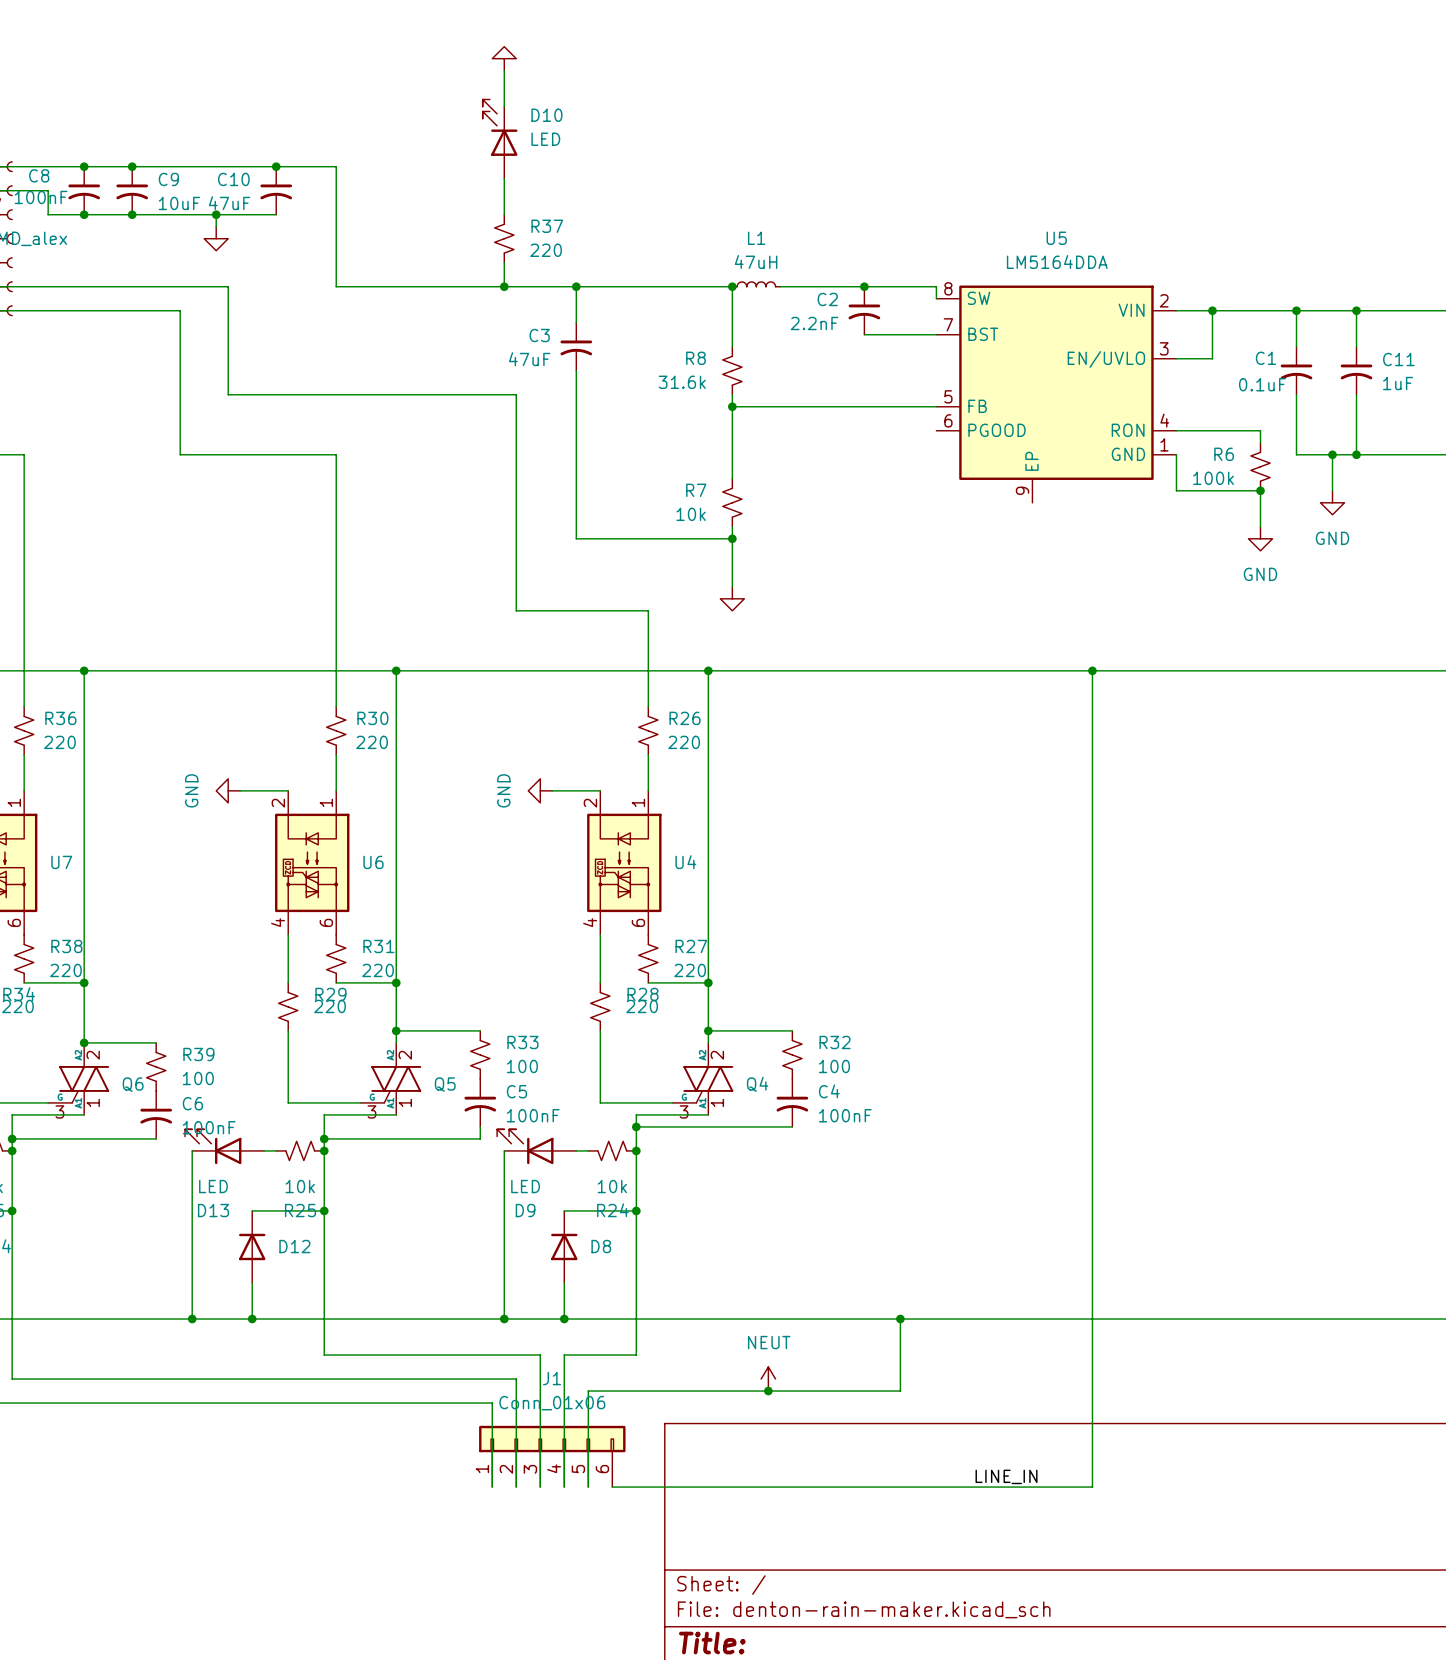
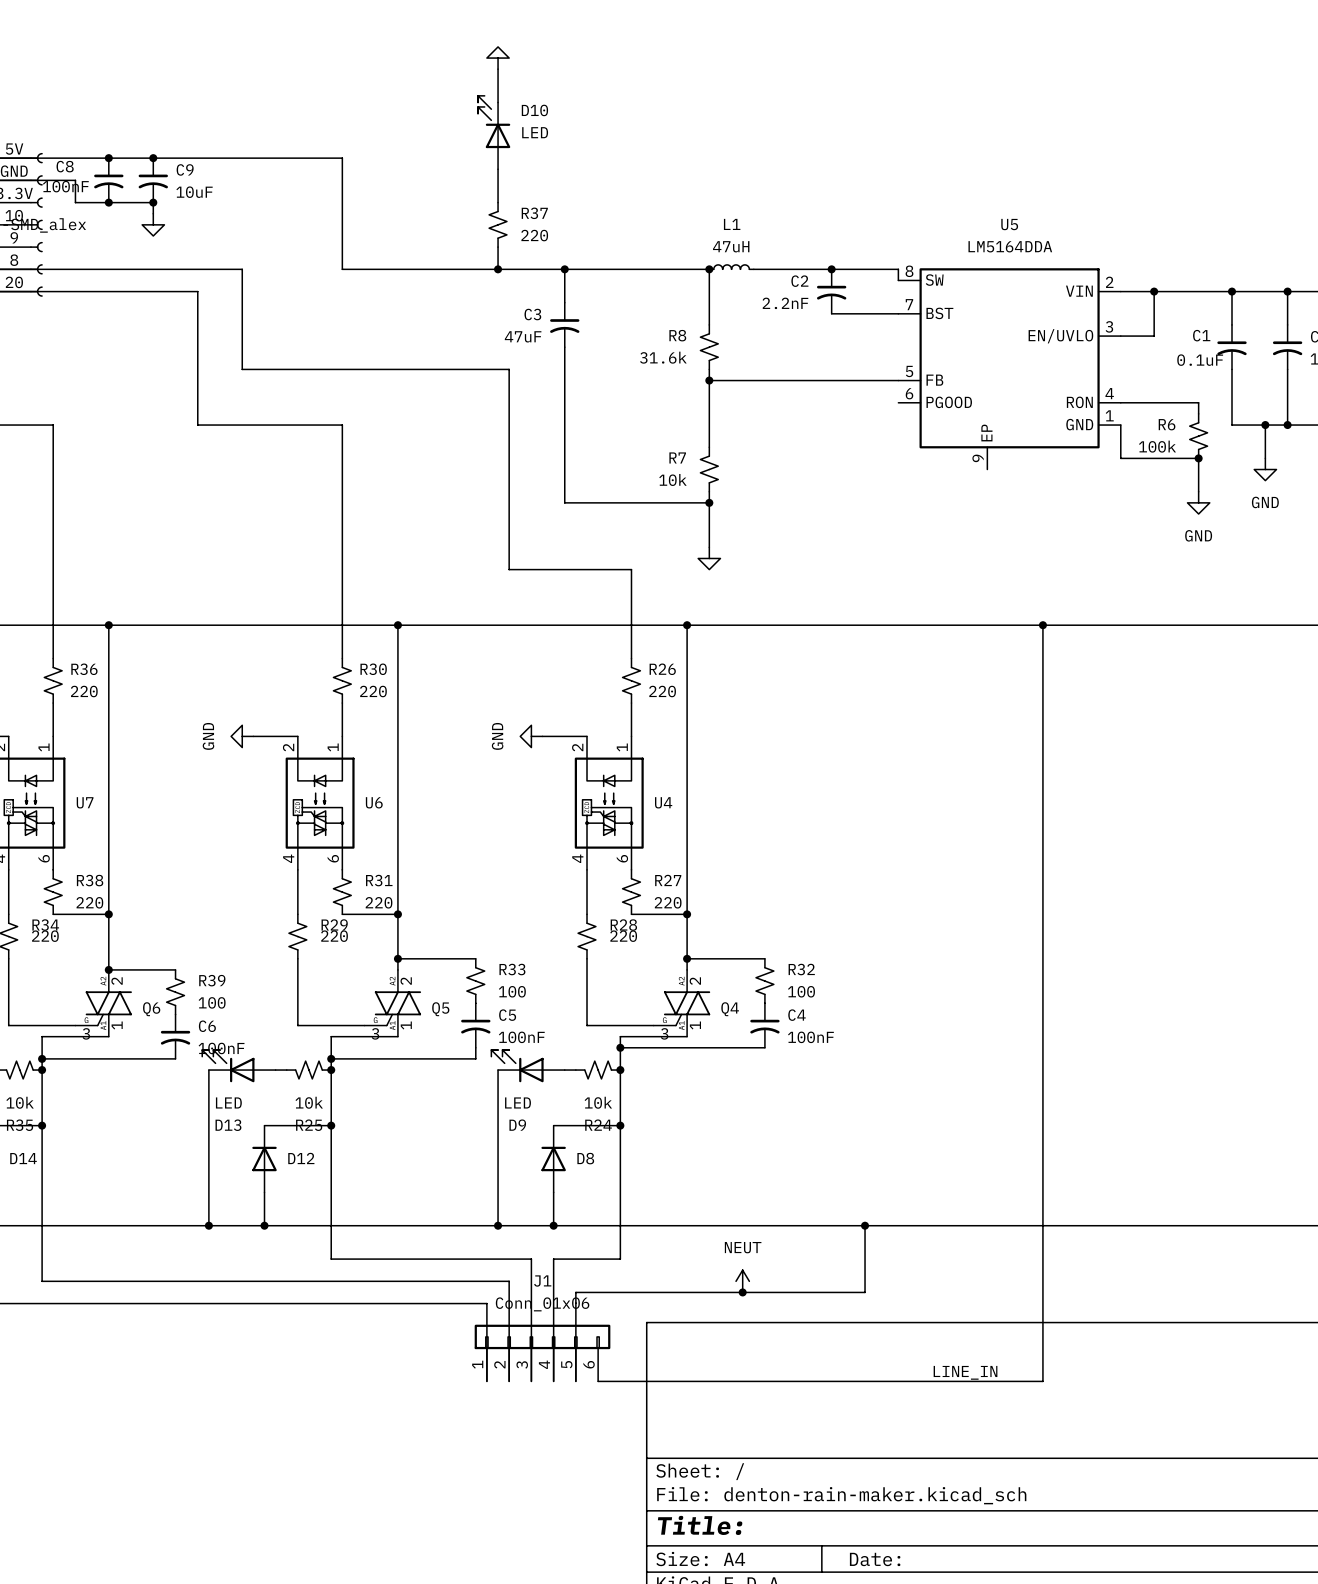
junction: (276, 166) -> none
C10: 47uF (276, 190) -> none
wire: (132, 214) (276, 214) -> (153, 202) (153, 213)
wire: (216, 214) (216, 226) -> none
junction: (216, 214) -> none
power symbol position: (216, 238) -> (153, 224)

